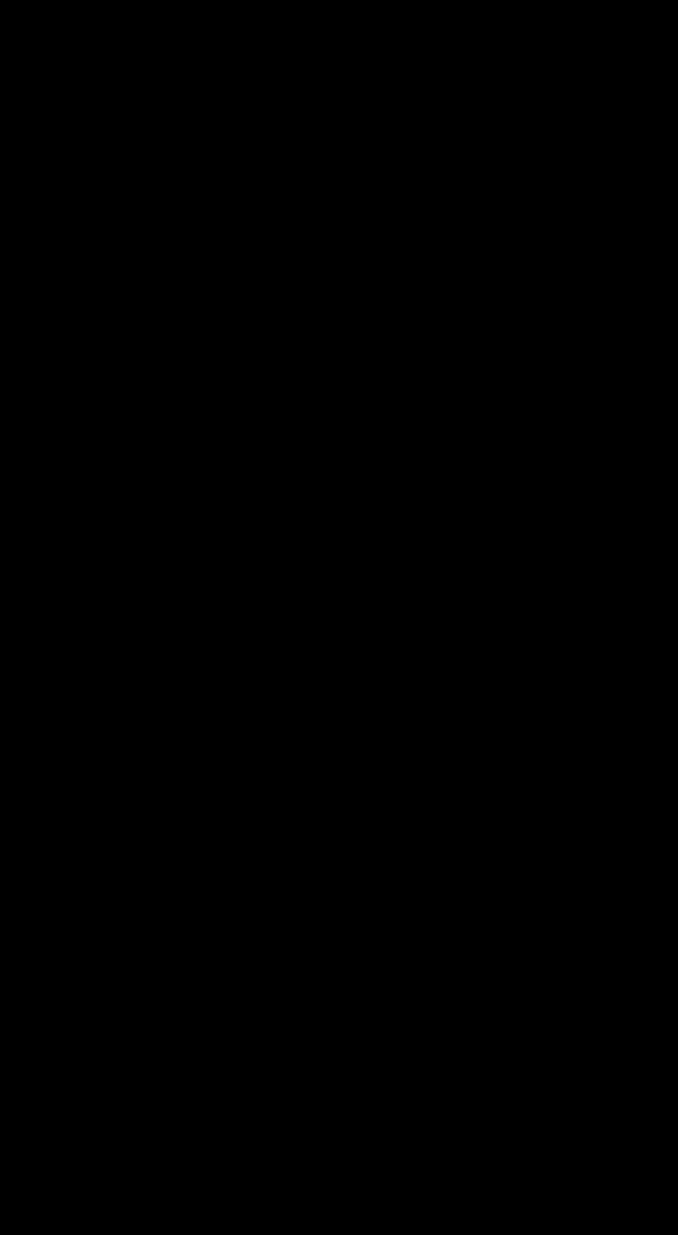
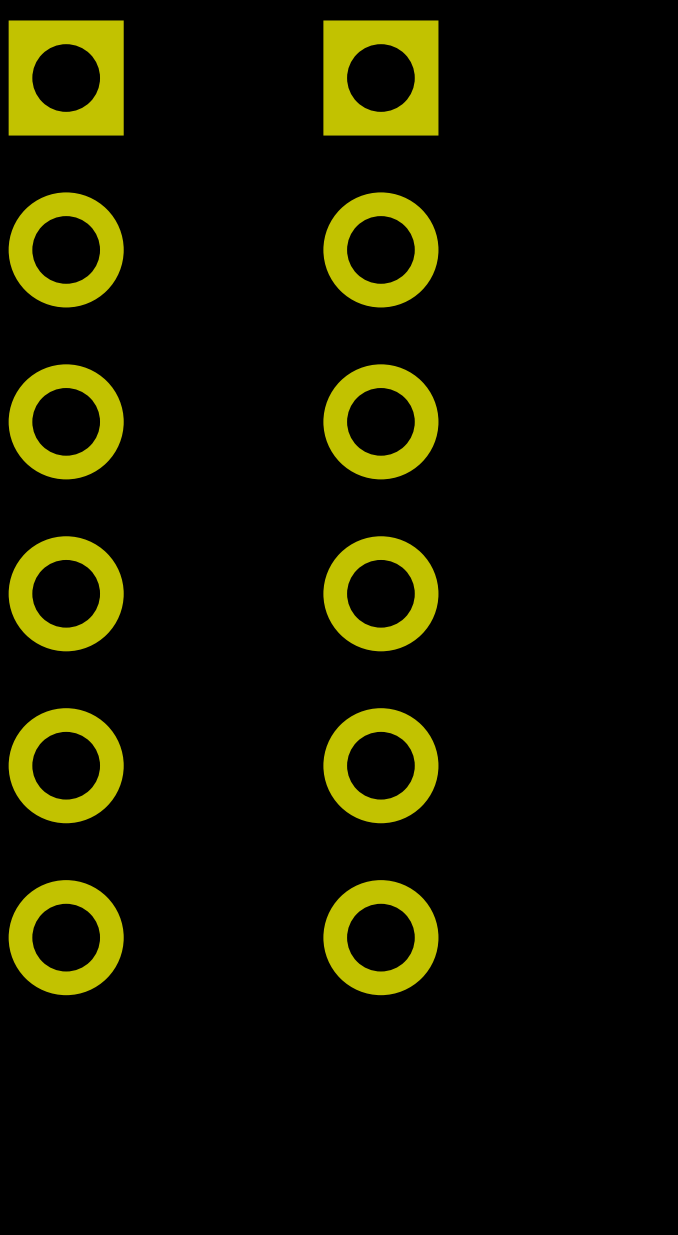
part: none -> (66, 507)
part: none -> (380, 507)

